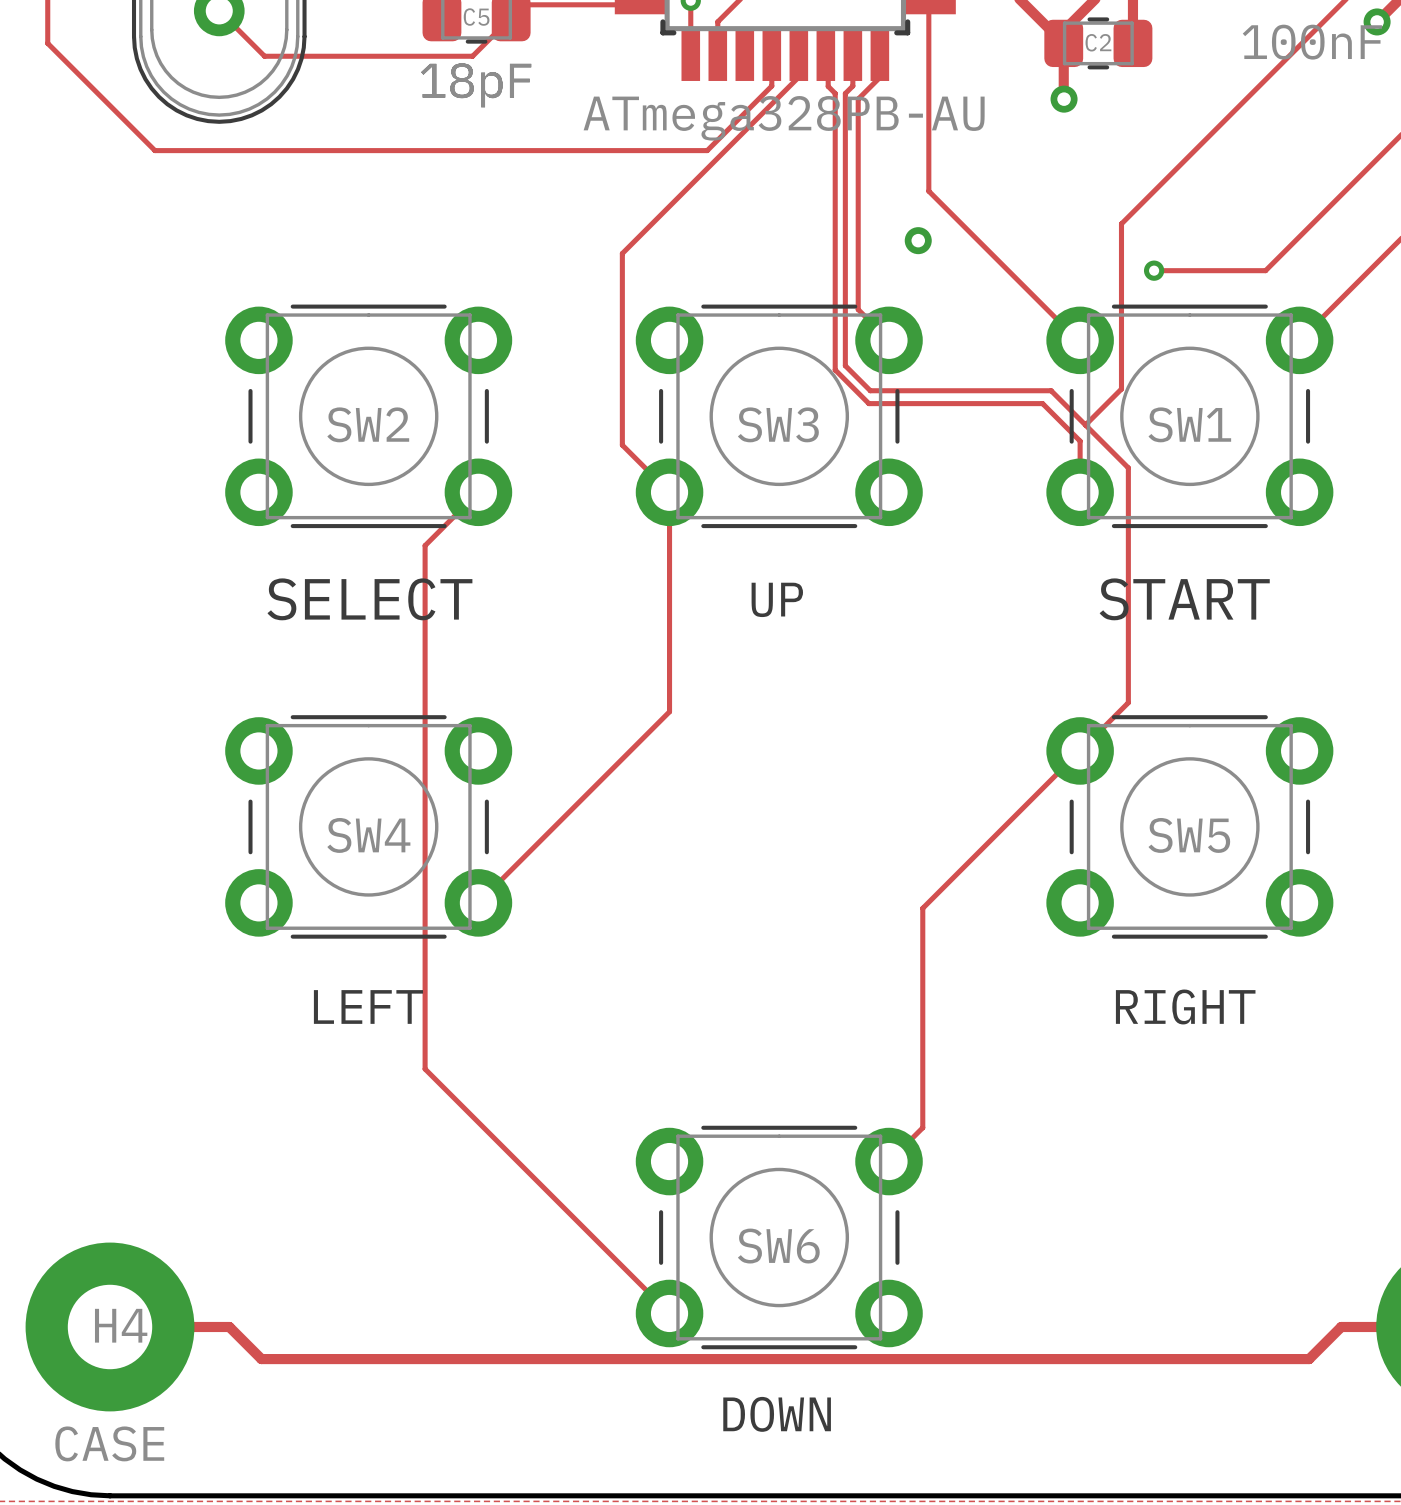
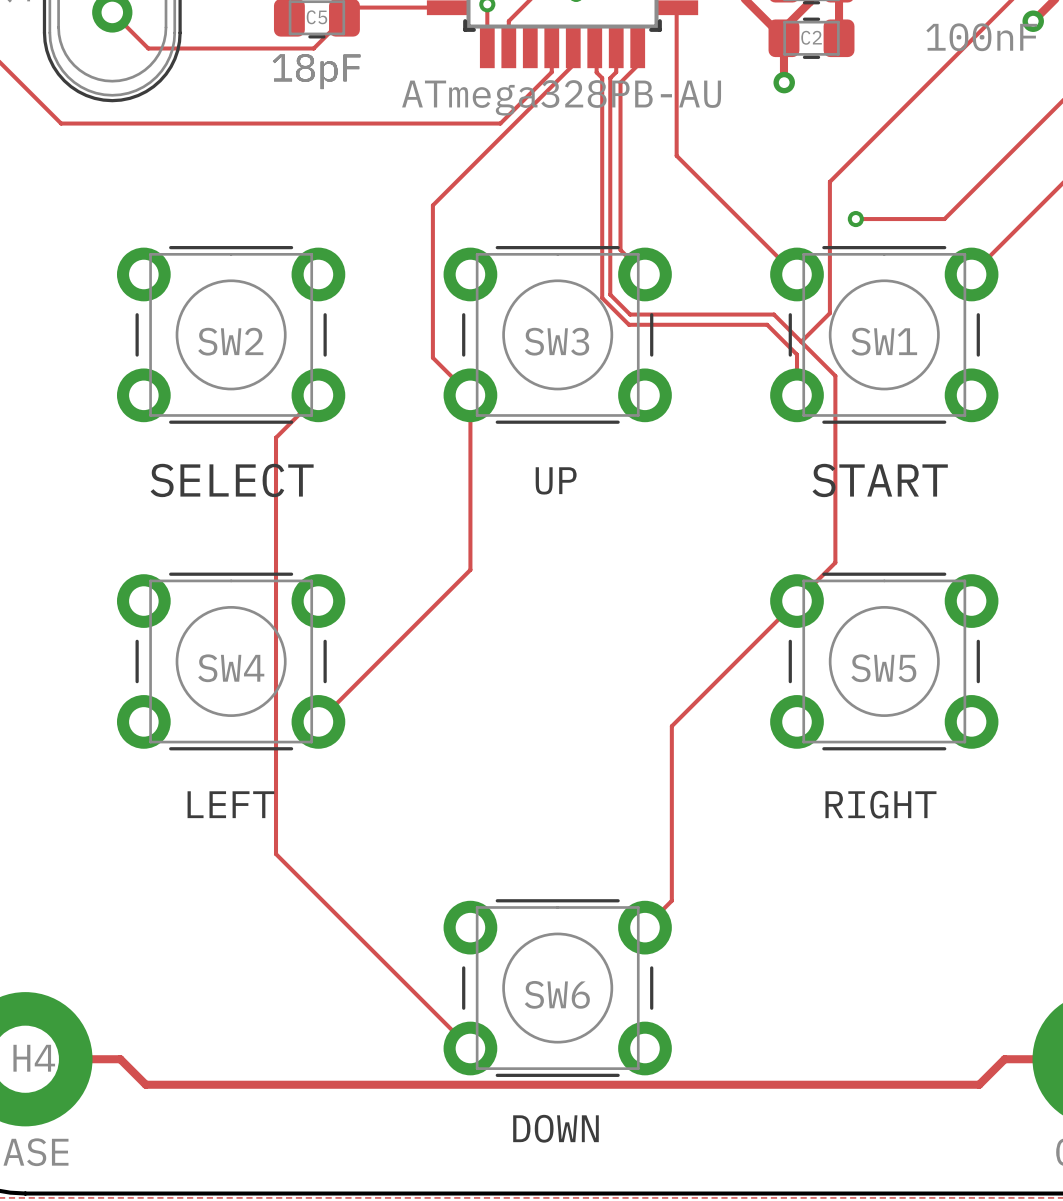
via: (918, 240) -> none

